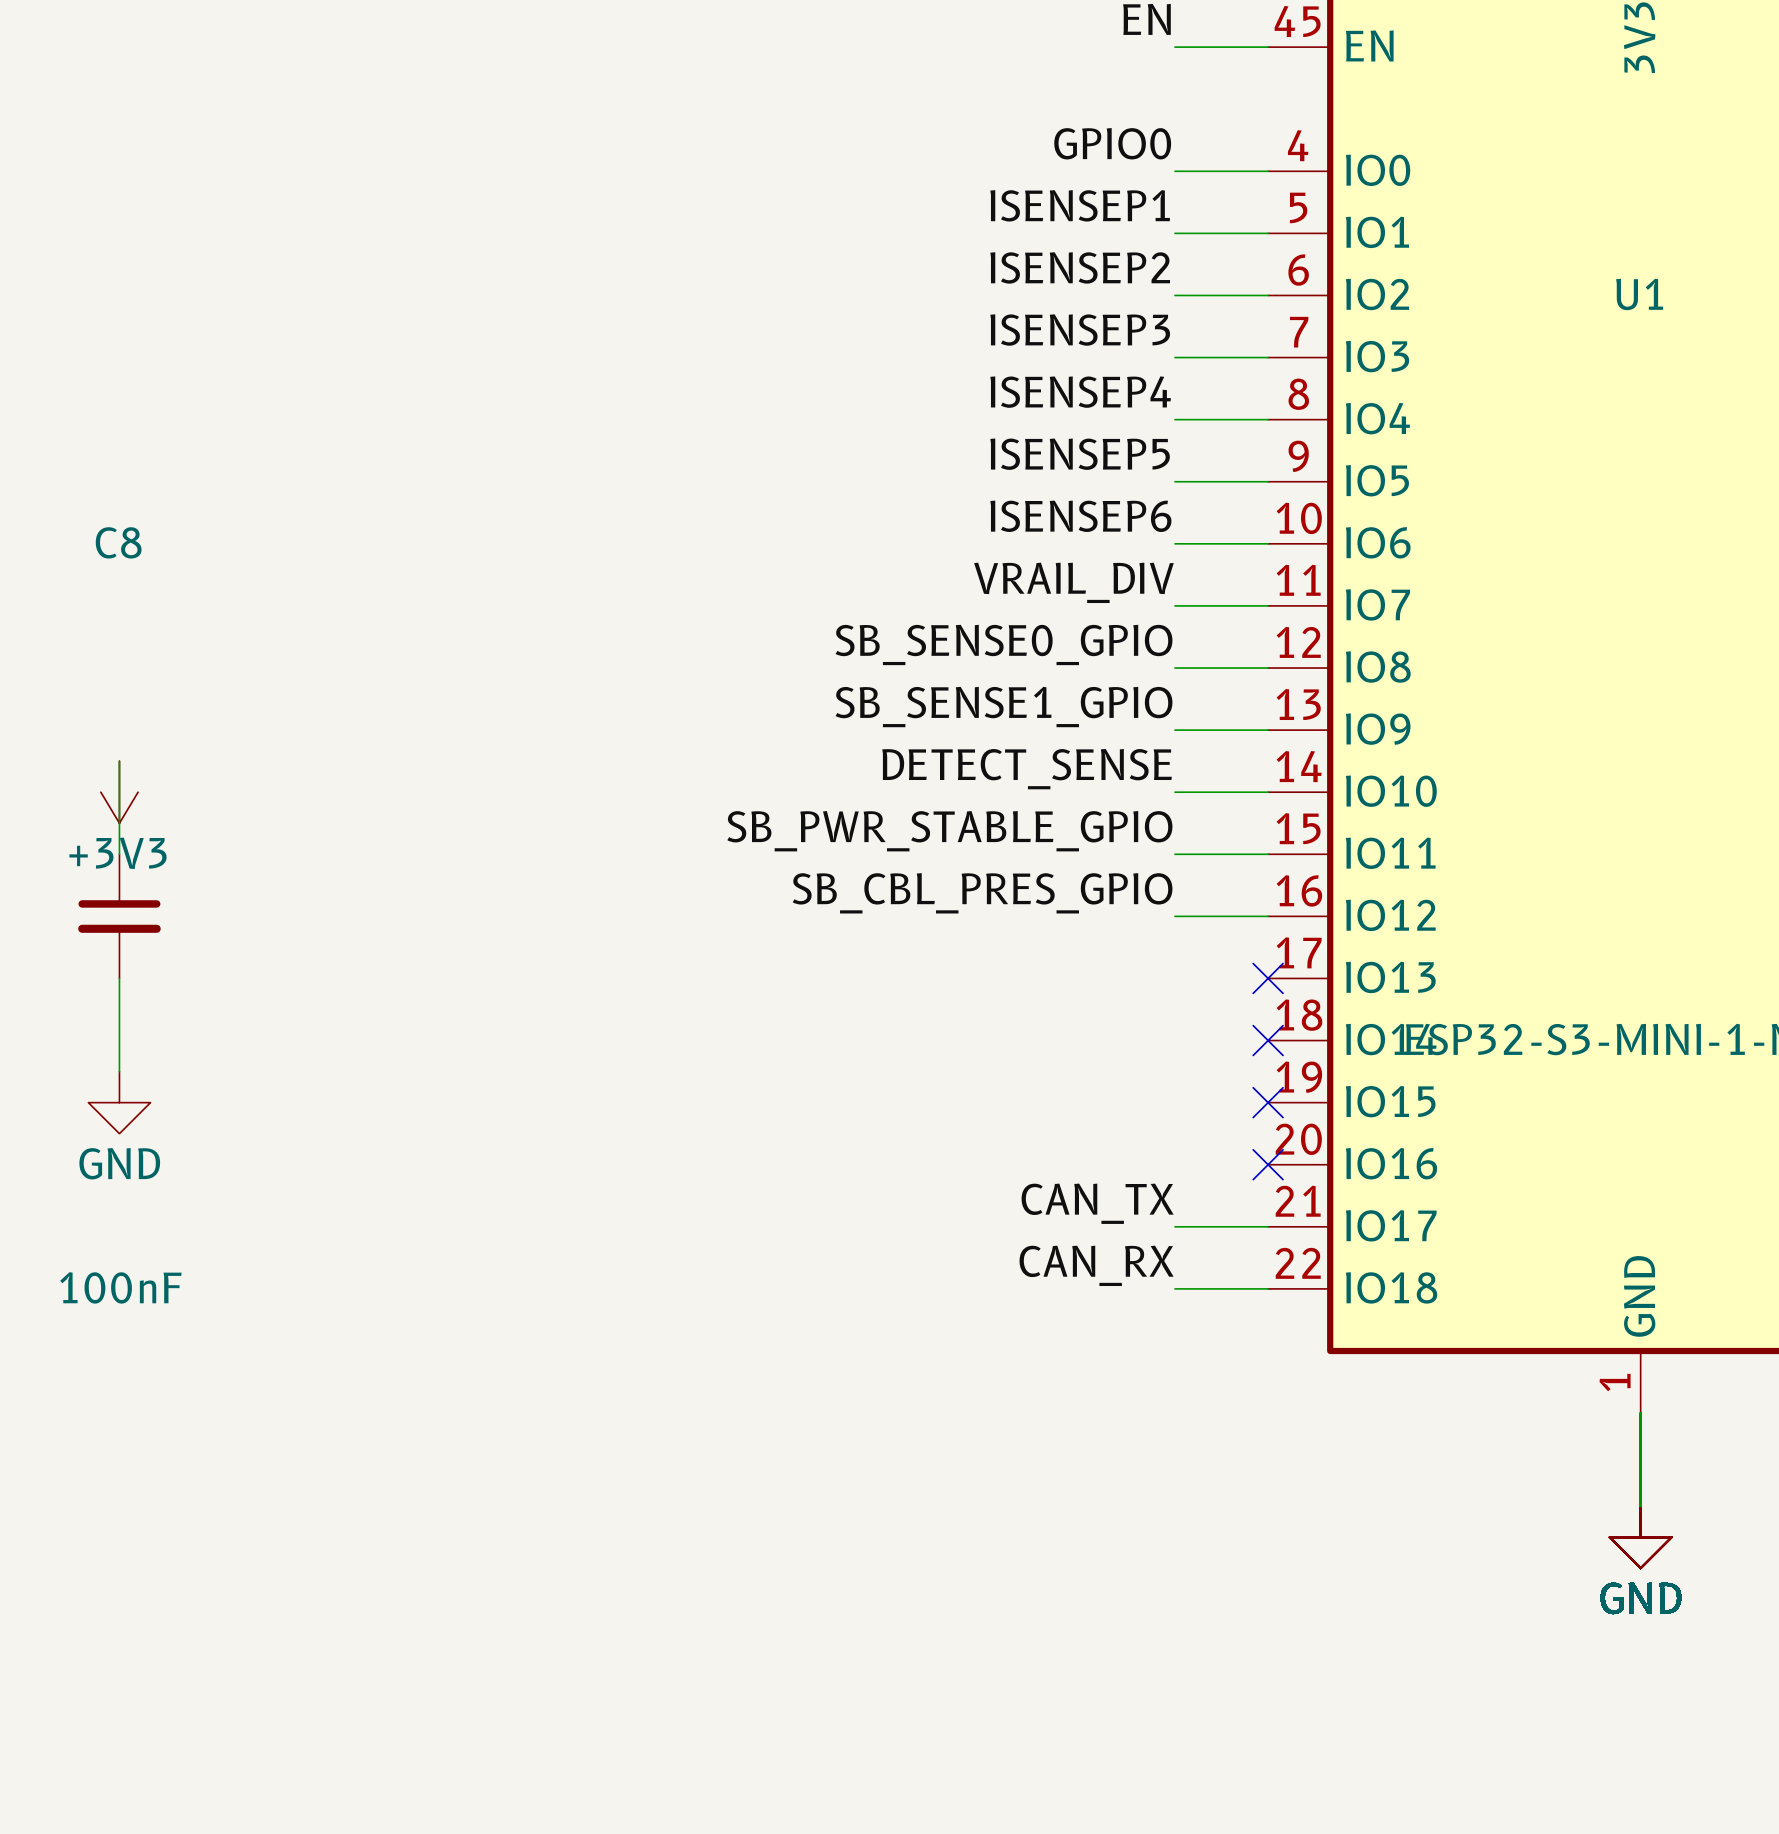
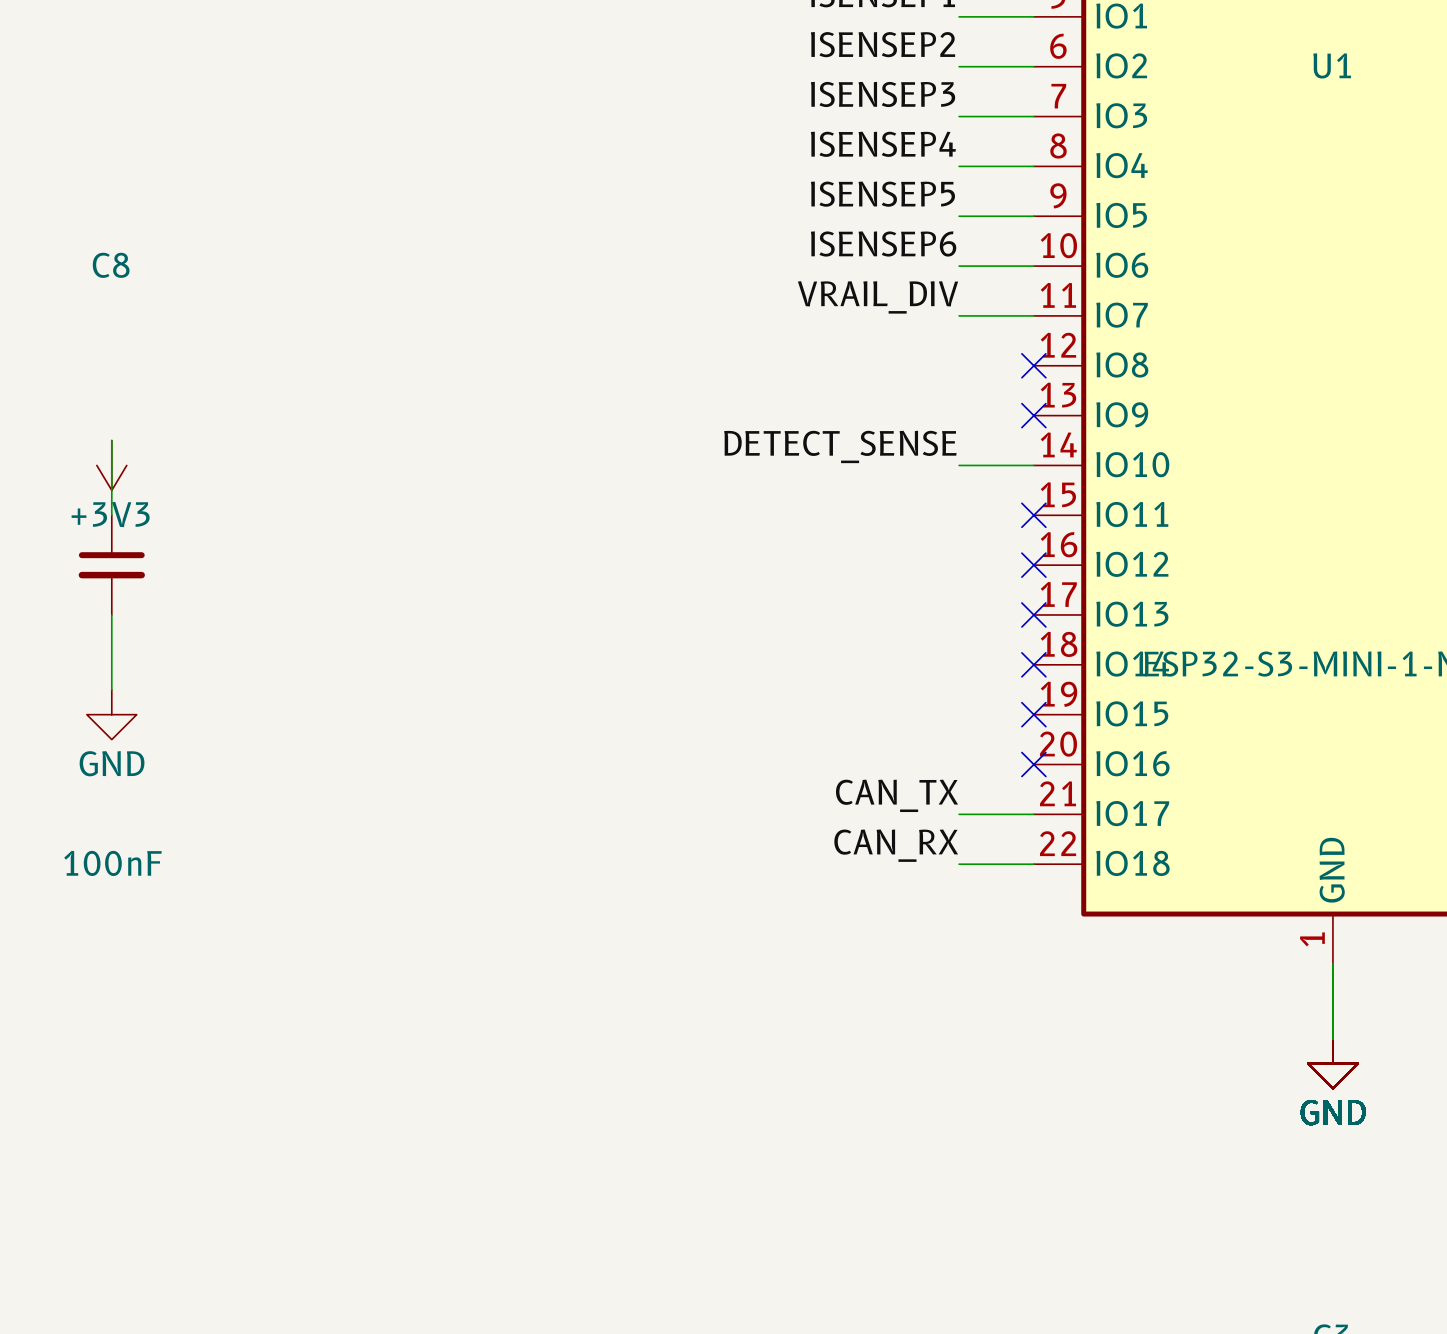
label: SB_SENSE0_GPIO (1004, 644) -> none
wire: (1174, 668) (1268, 668) -> none
no-connect mark: none -> (1033, 365)
label: SB_SENSE1_GPIO (1004, 707) -> none
wire: (1174, 730) (1268, 730) -> none
no-connect mark: none -> (1033, 415)
label: SB_PWR_STABLE_GPIO (949, 831) -> none
wire: (1174, 854) (1268, 854) -> none
no-connect mark: none -> (1033, 515)
label: SB_CBL_PRES_GPIO (982, 893) -> none
wire: (1174, 916) (1268, 916) -> none
no-connect mark: none -> (1033, 565)

